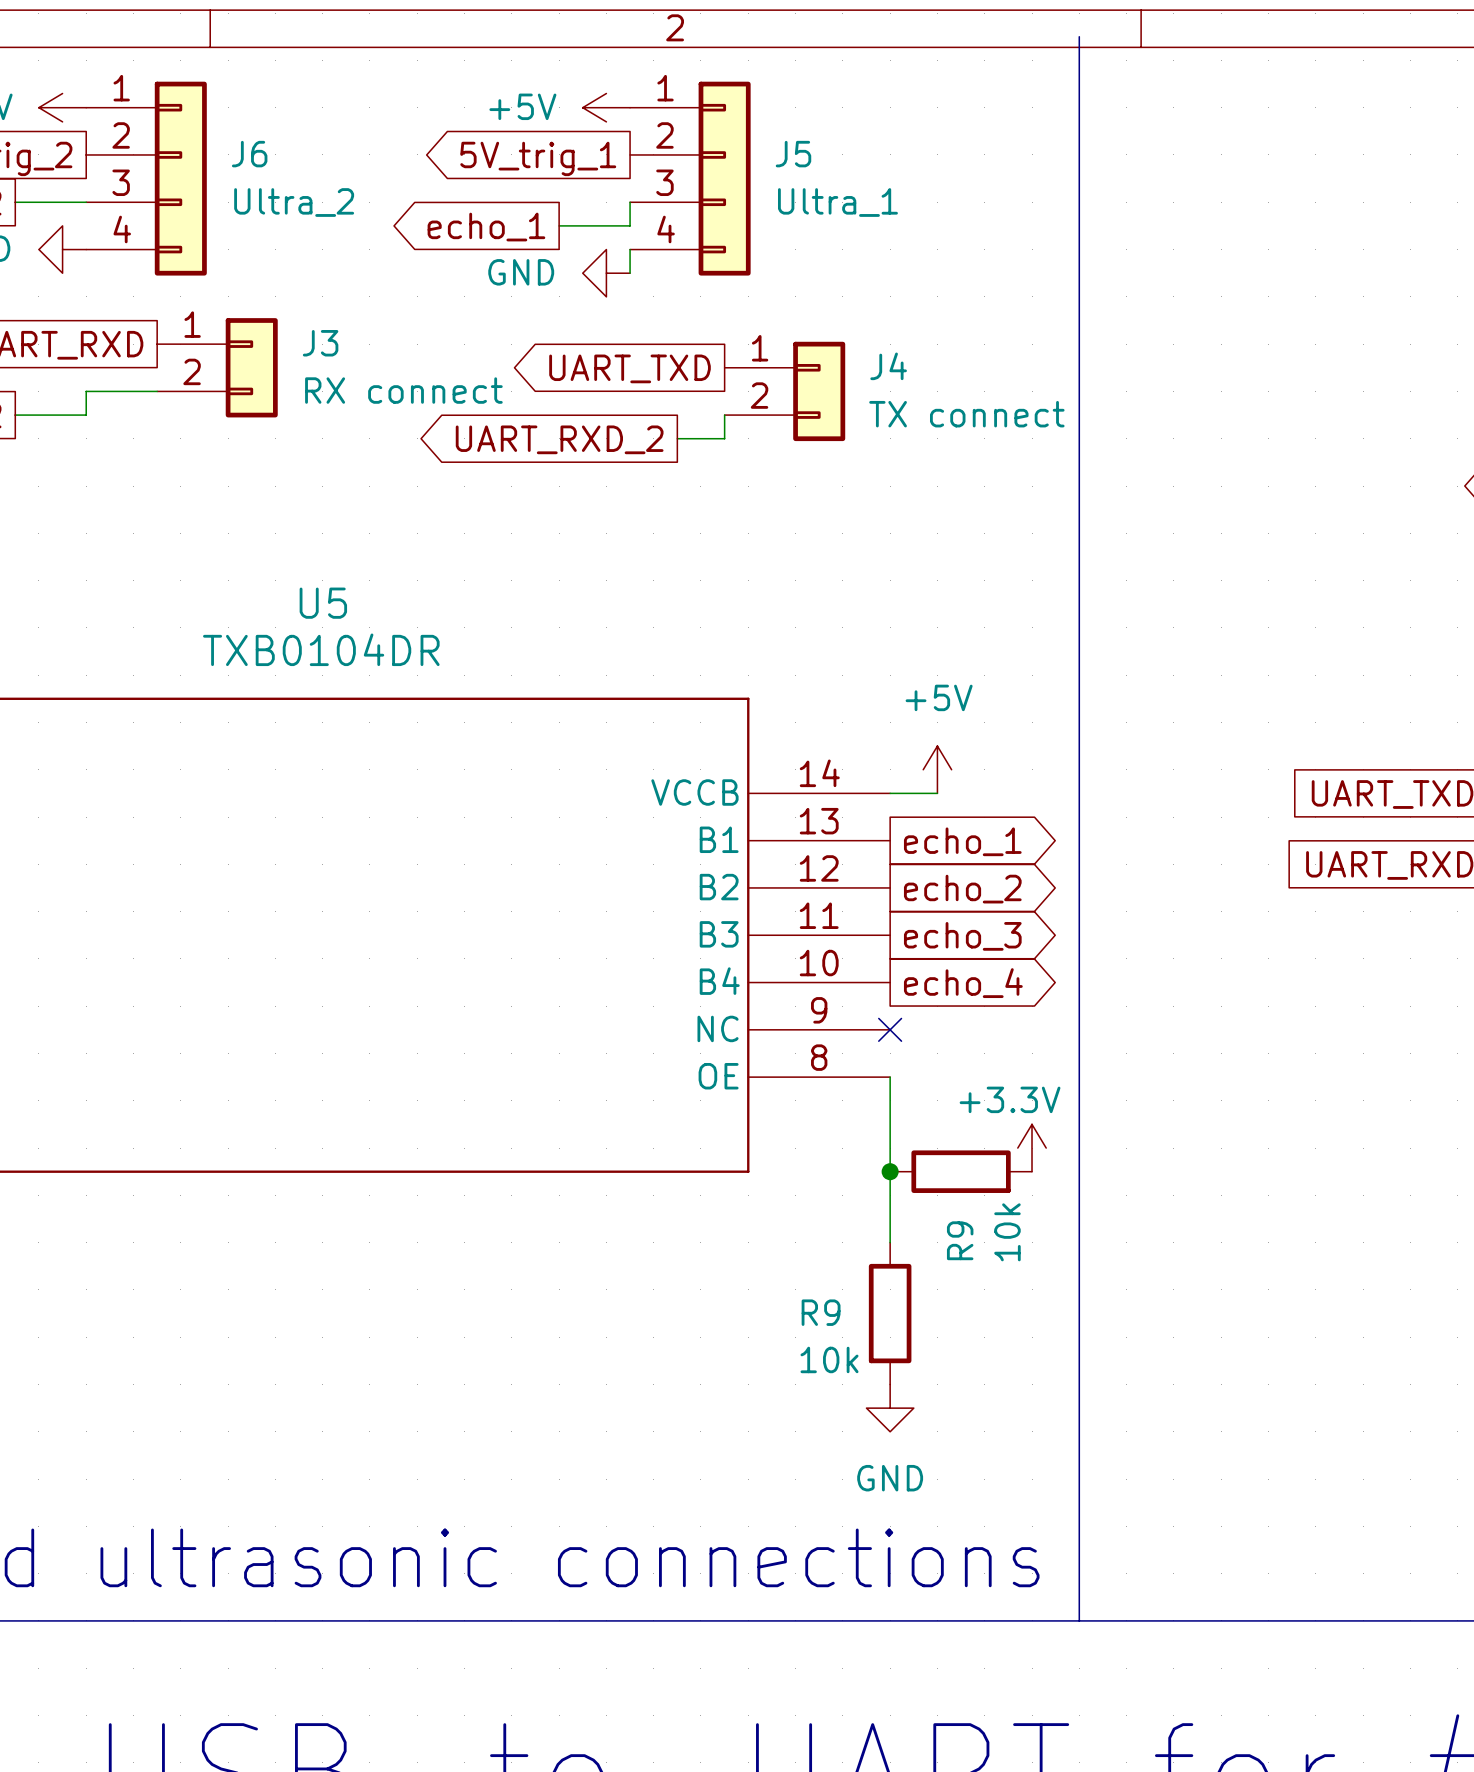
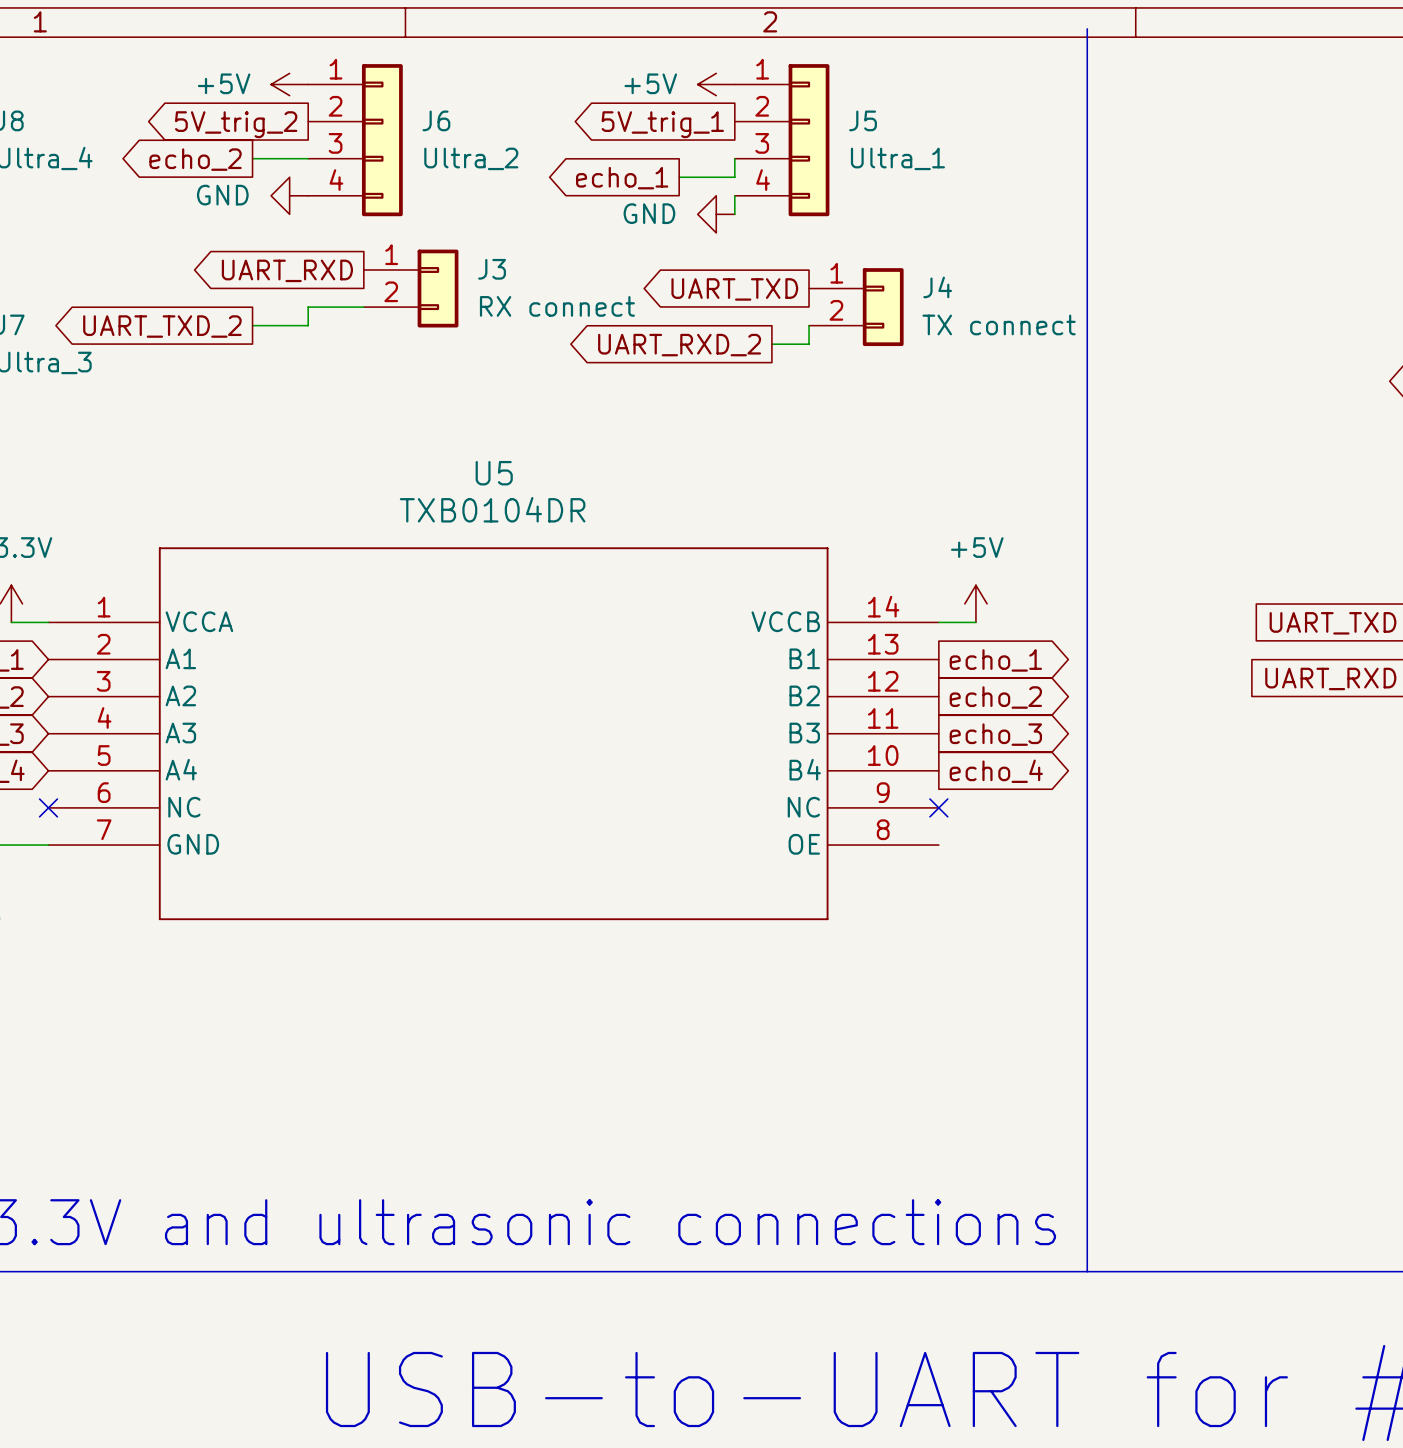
wire: (890, 1077) (890, 1242) -> none
power symbol: +3.3V (1032, 1148) -> none
junction: (890, 1171) -> none
R9: 10k (961, 1171) -> none
R9: 10k (890, 1313) -> none
power symbol: GND (890, 1408) -> none

